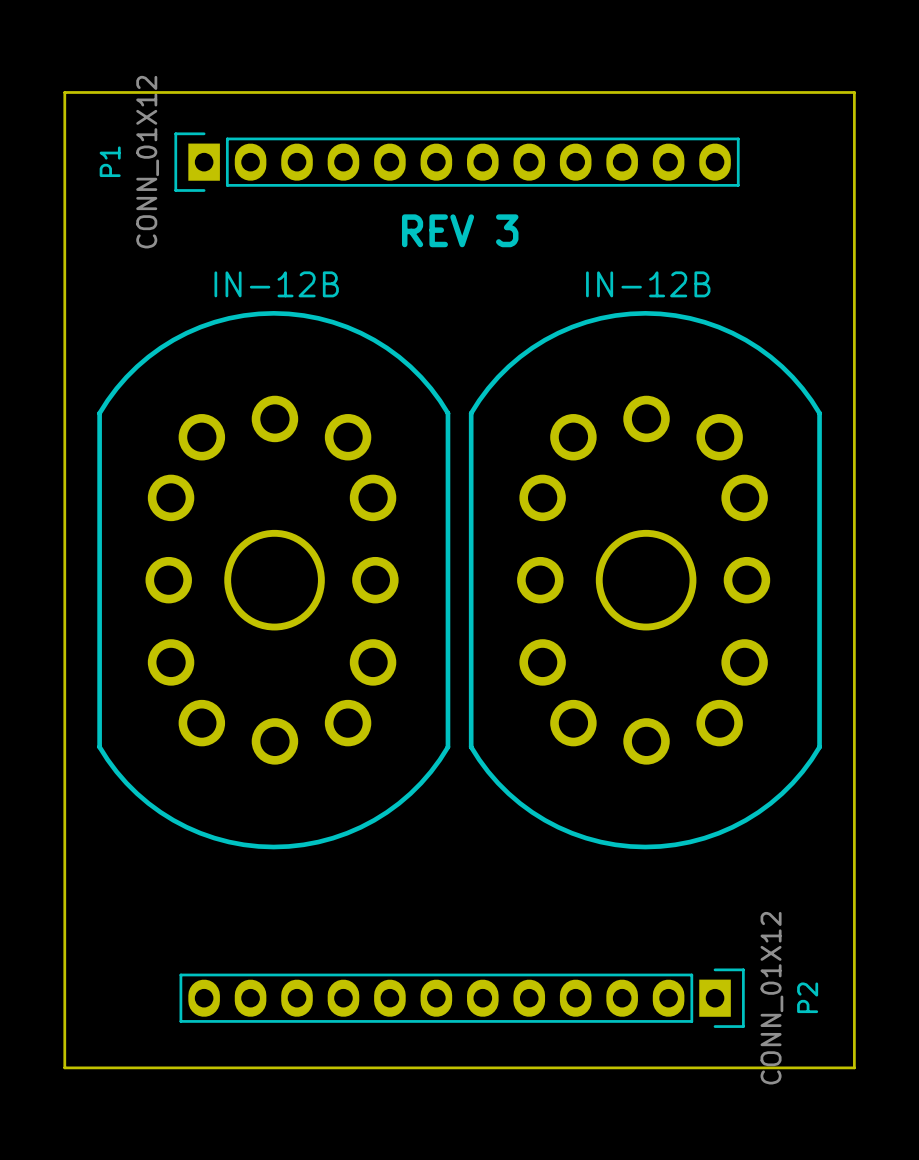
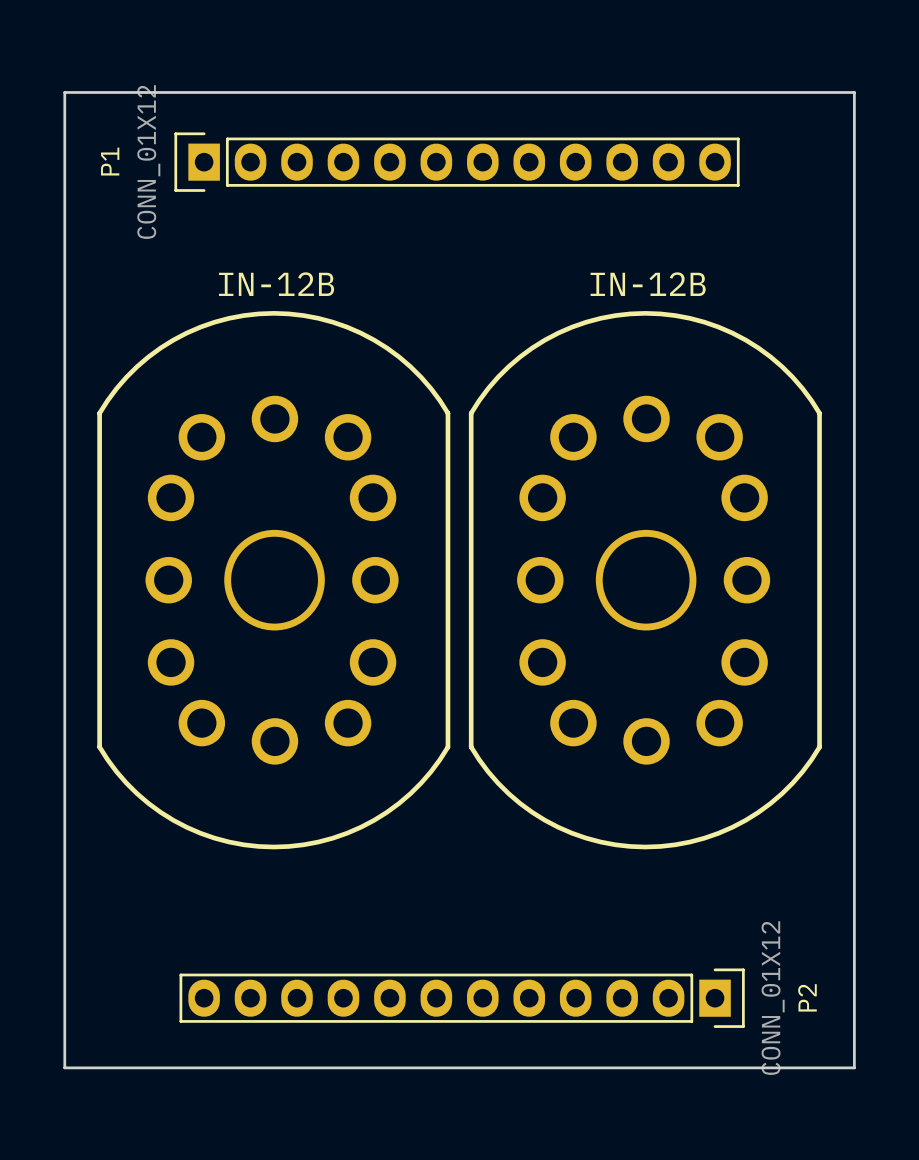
text: REV 3 (460, 230) -> none

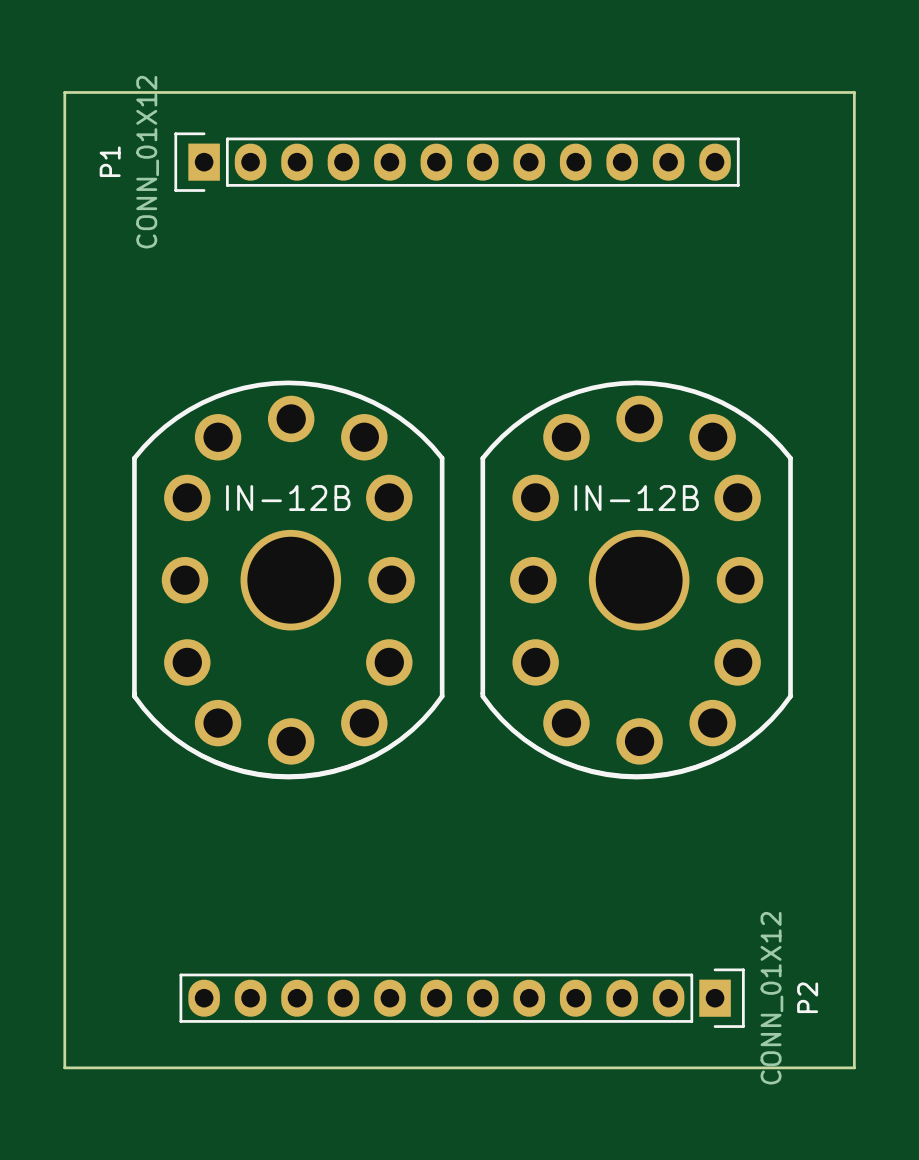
part value position: IN-12B (276, 284) -> IN-12B (288, 498)
part value position: IN-12B (648, 284) -> IN-12B (636, 498)
part footprint: [97, 311, 451, 850] -> [132, 380, 445, 780]
part footprint: [468, 311, 822, 850] -> [480, 380, 793, 780]

